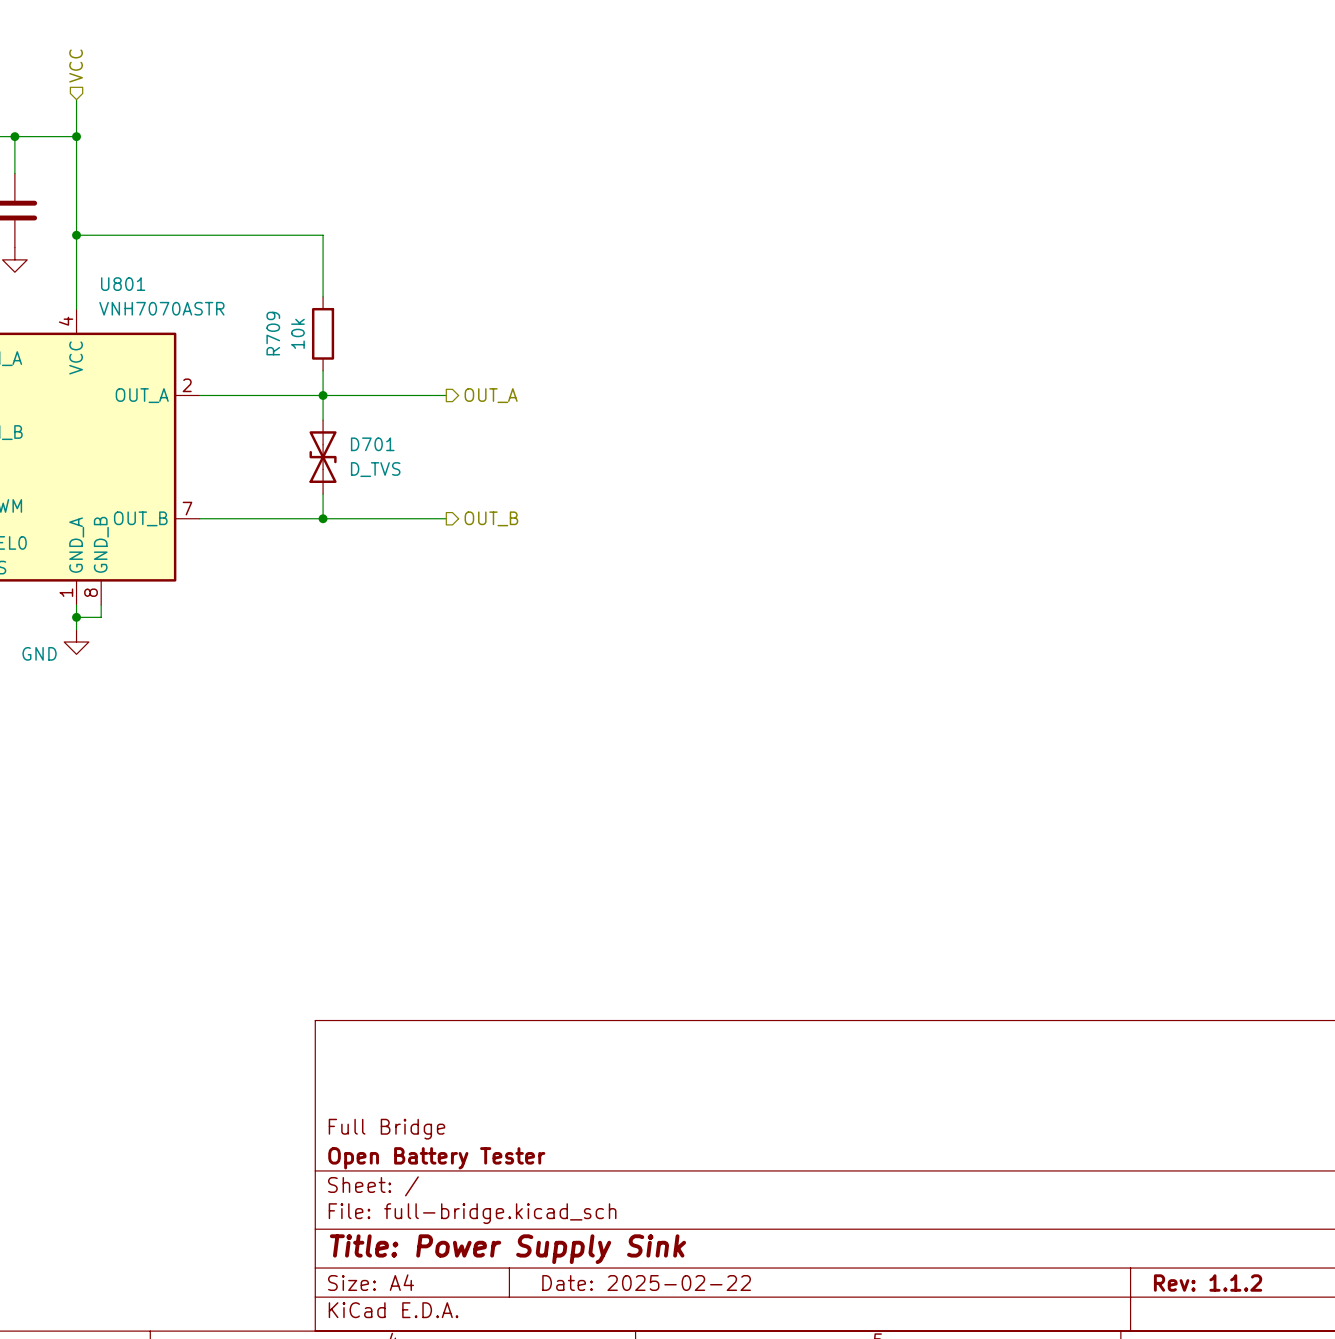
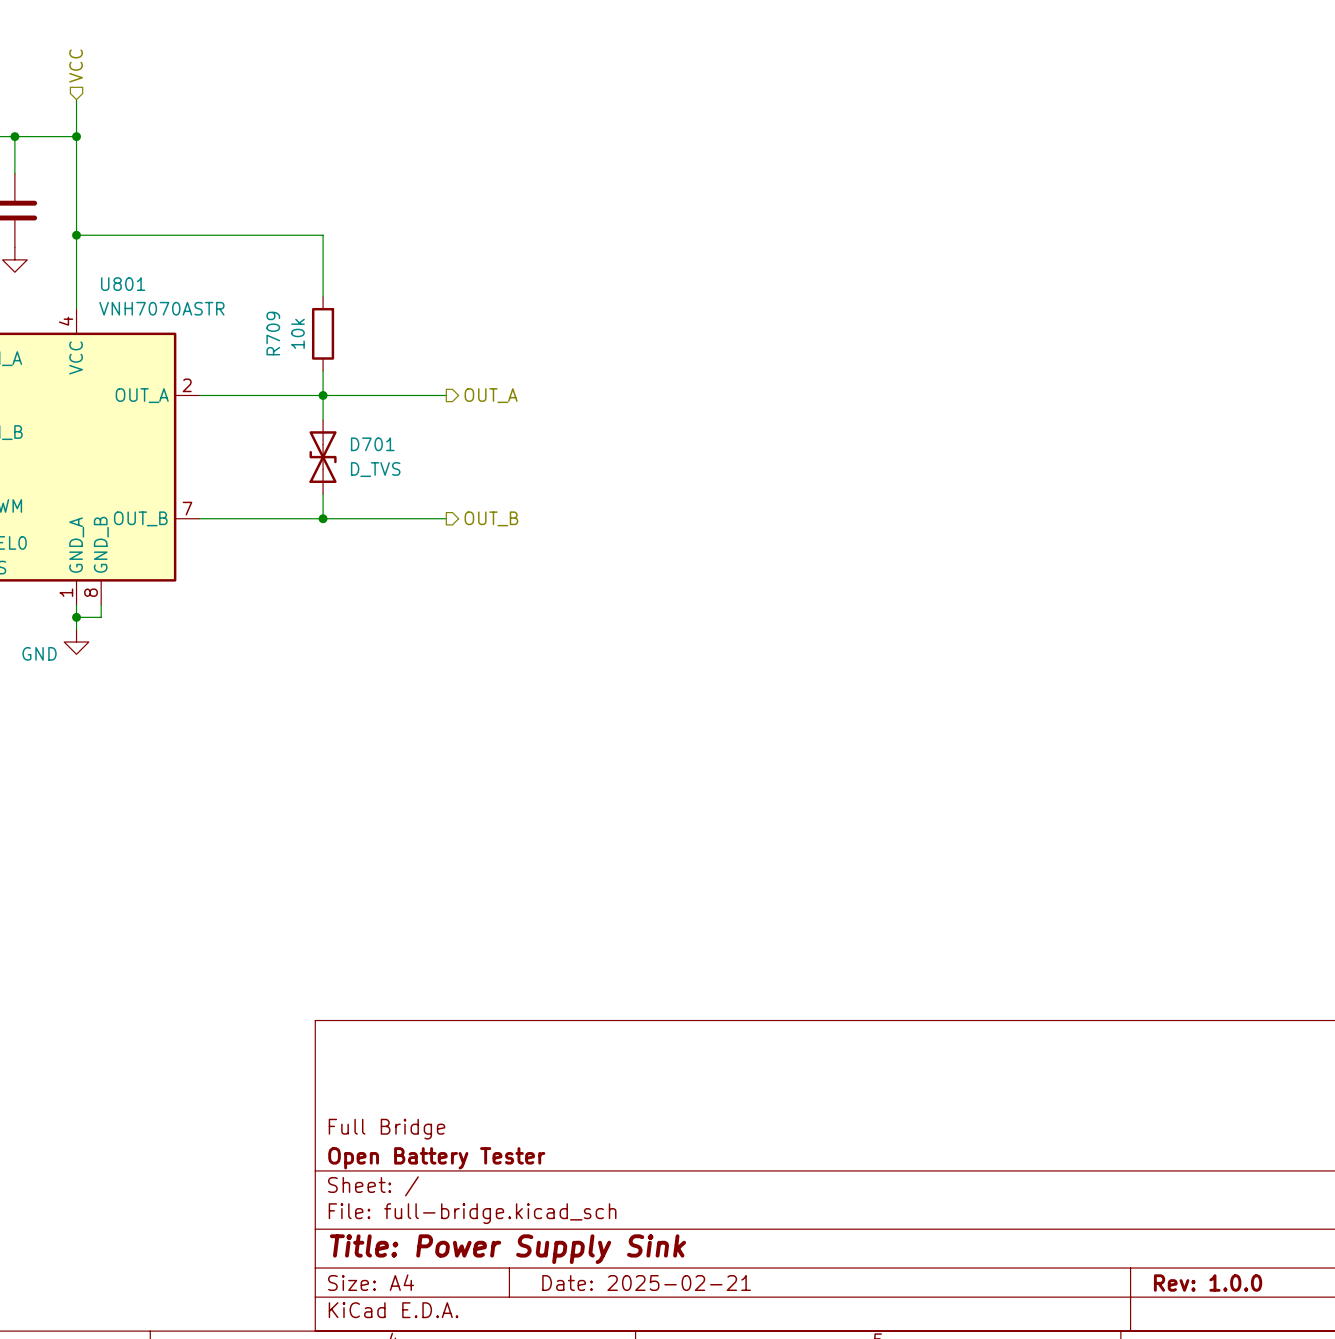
title block: Date: 2025-02-22 (646, 1283) -> Date: 2025-02-21 (646, 1283)
title block: Rev: 1.1.2 (1208, 1283) -> Rev: 1.0.0 (1208, 1283)

